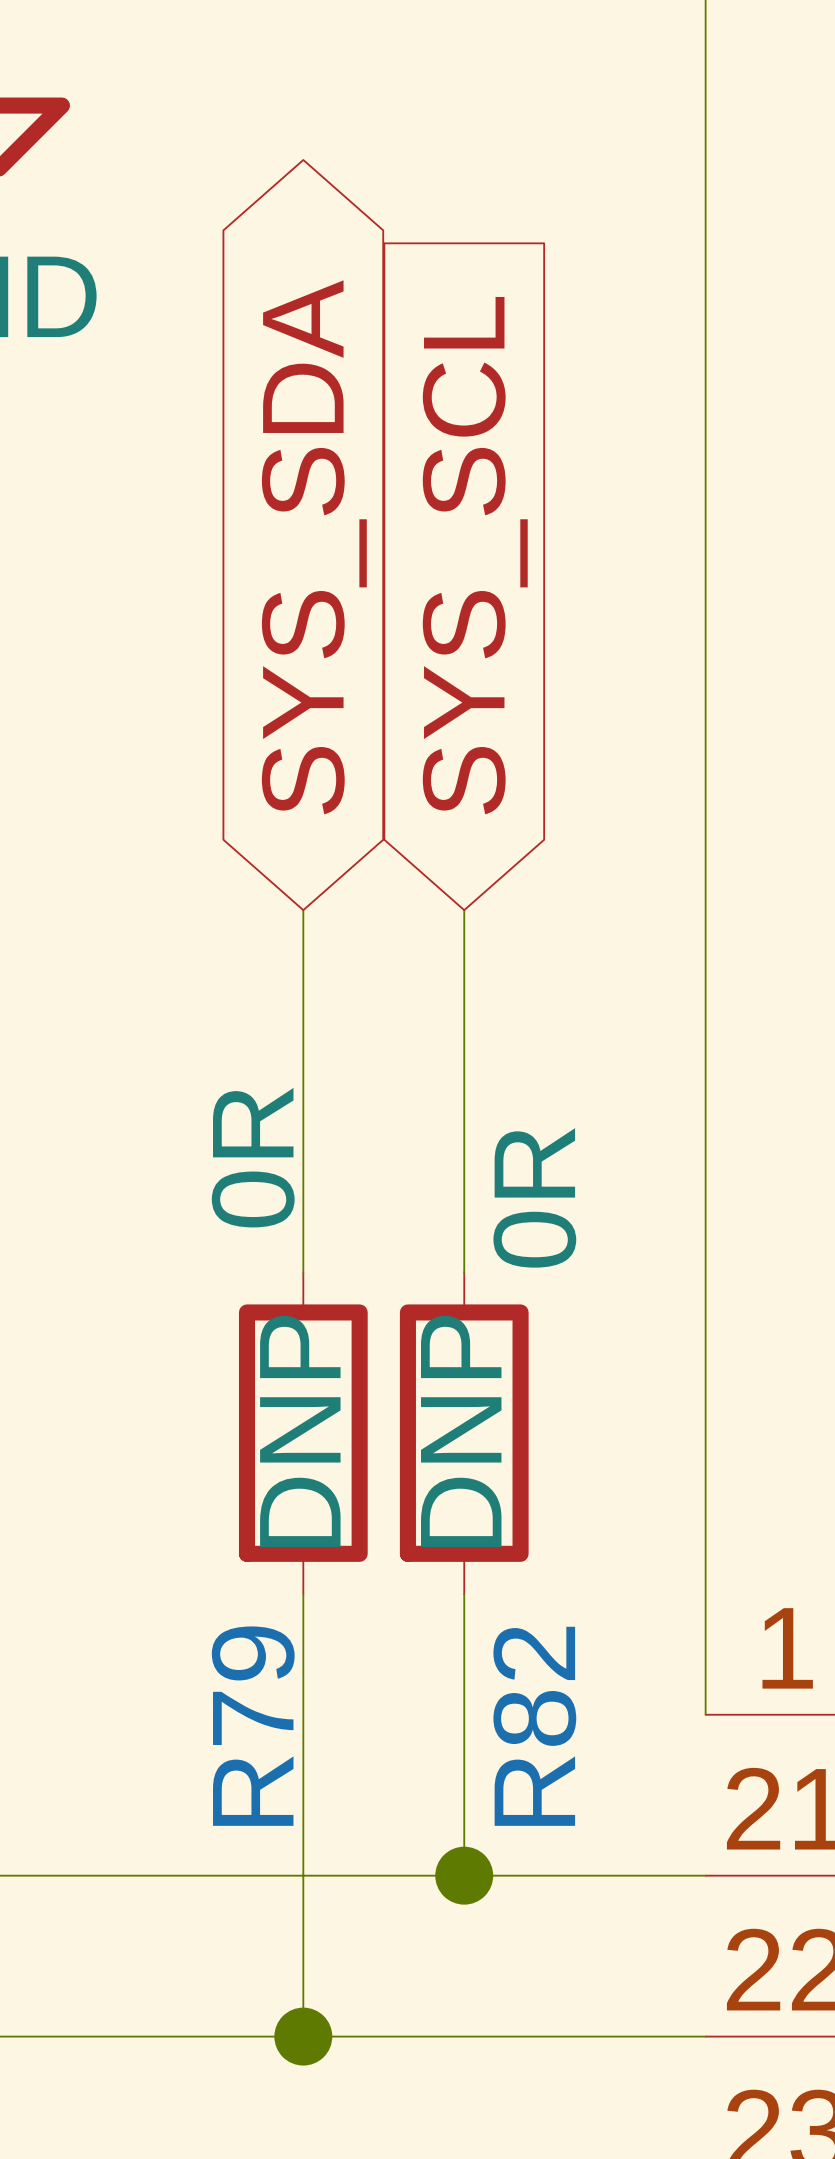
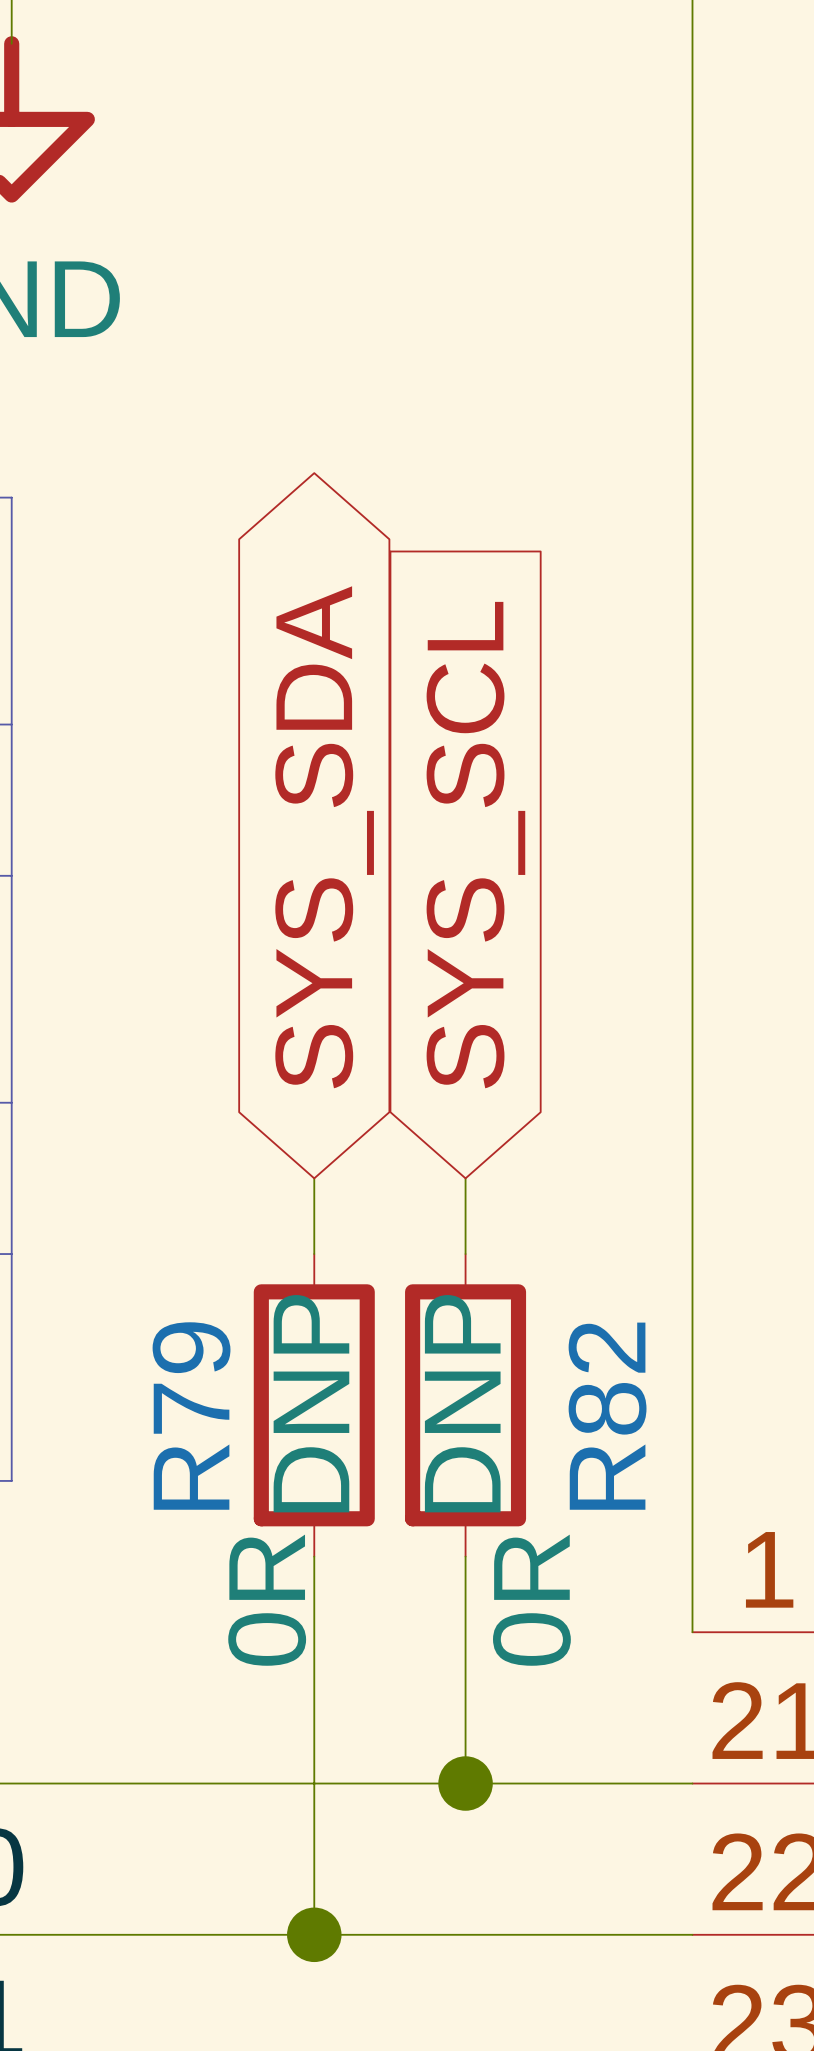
global label position: SYS_SDA (314, 547) -> SYS_SDA (324, 837)
global label position: SYS_SCL (475, 555) -> SYS_SCL (475, 845)
wire: (303, 910) (303, 1231) -> none
wire: (464, 910) (464, 1231) -> none
R79 text position: 0R (253, 1157) -> 0R (267, 1600)
R82 text position: 0R (534, 1197) -> 0R (531, 1600)
R79 position: (303, 1433) -> (314, 1405)
R82 position: (464, 1433) -> (465, 1405)
R79 name position: R79 (253, 1726) -> R79 (191, 1416)
R82 name position: R82 (534, 1726) -> R82 (607, 1416)

